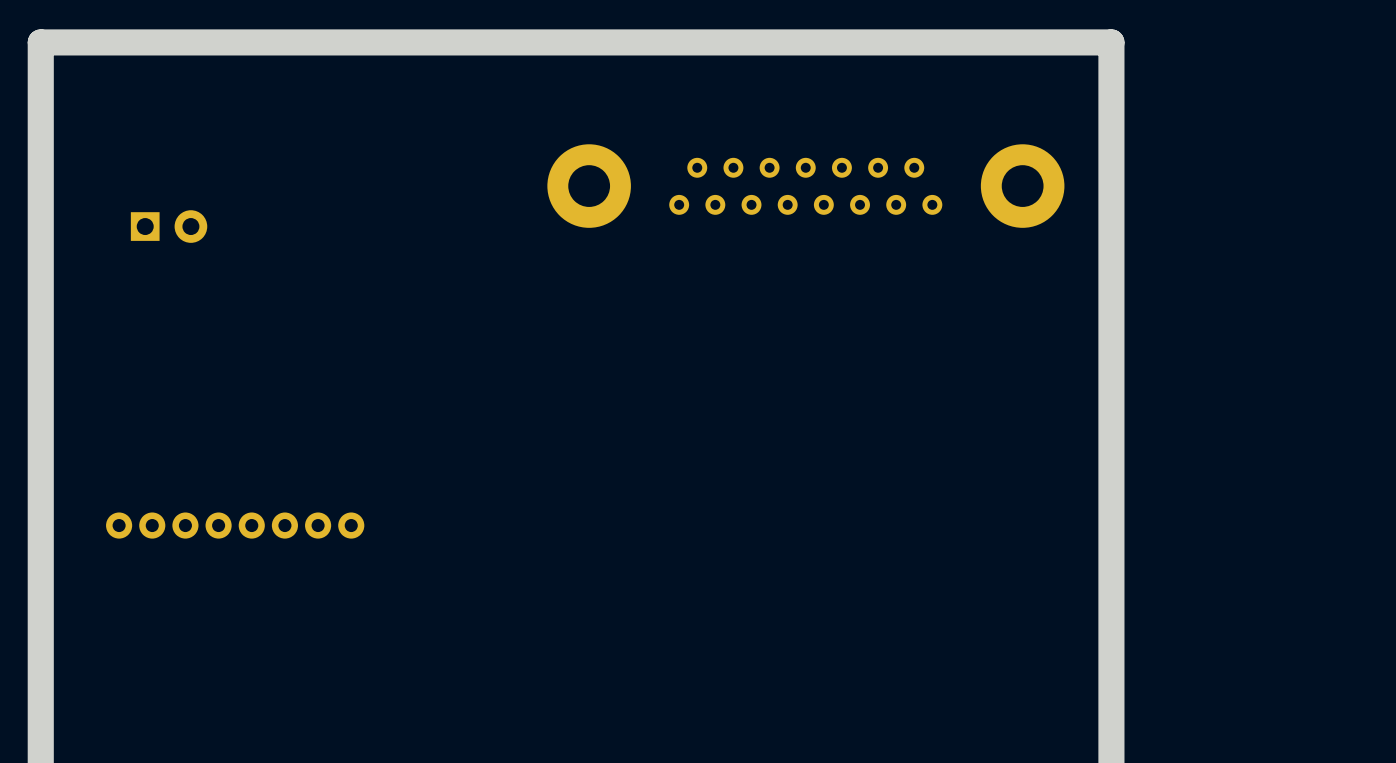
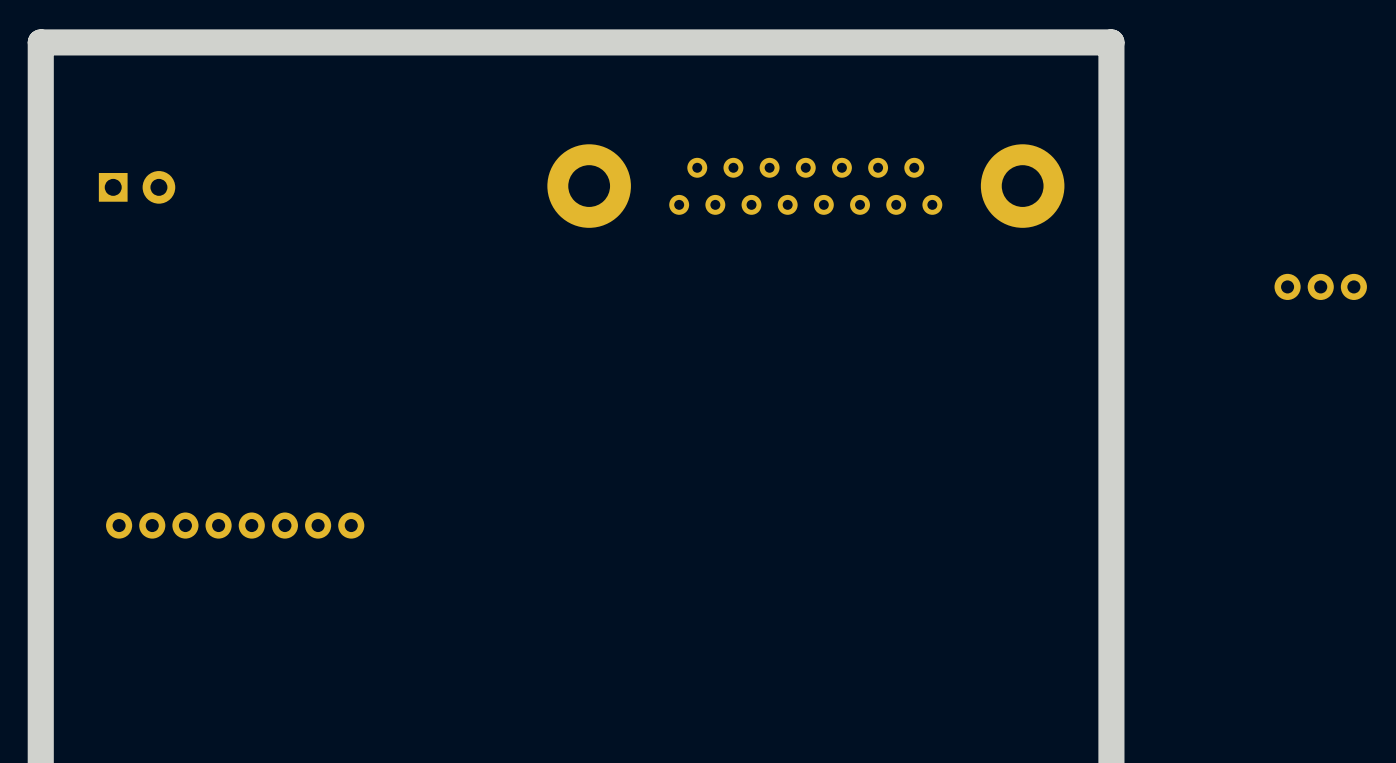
part position: (169, 226) -> (137, 187)
part: none -> (1320, 286)

